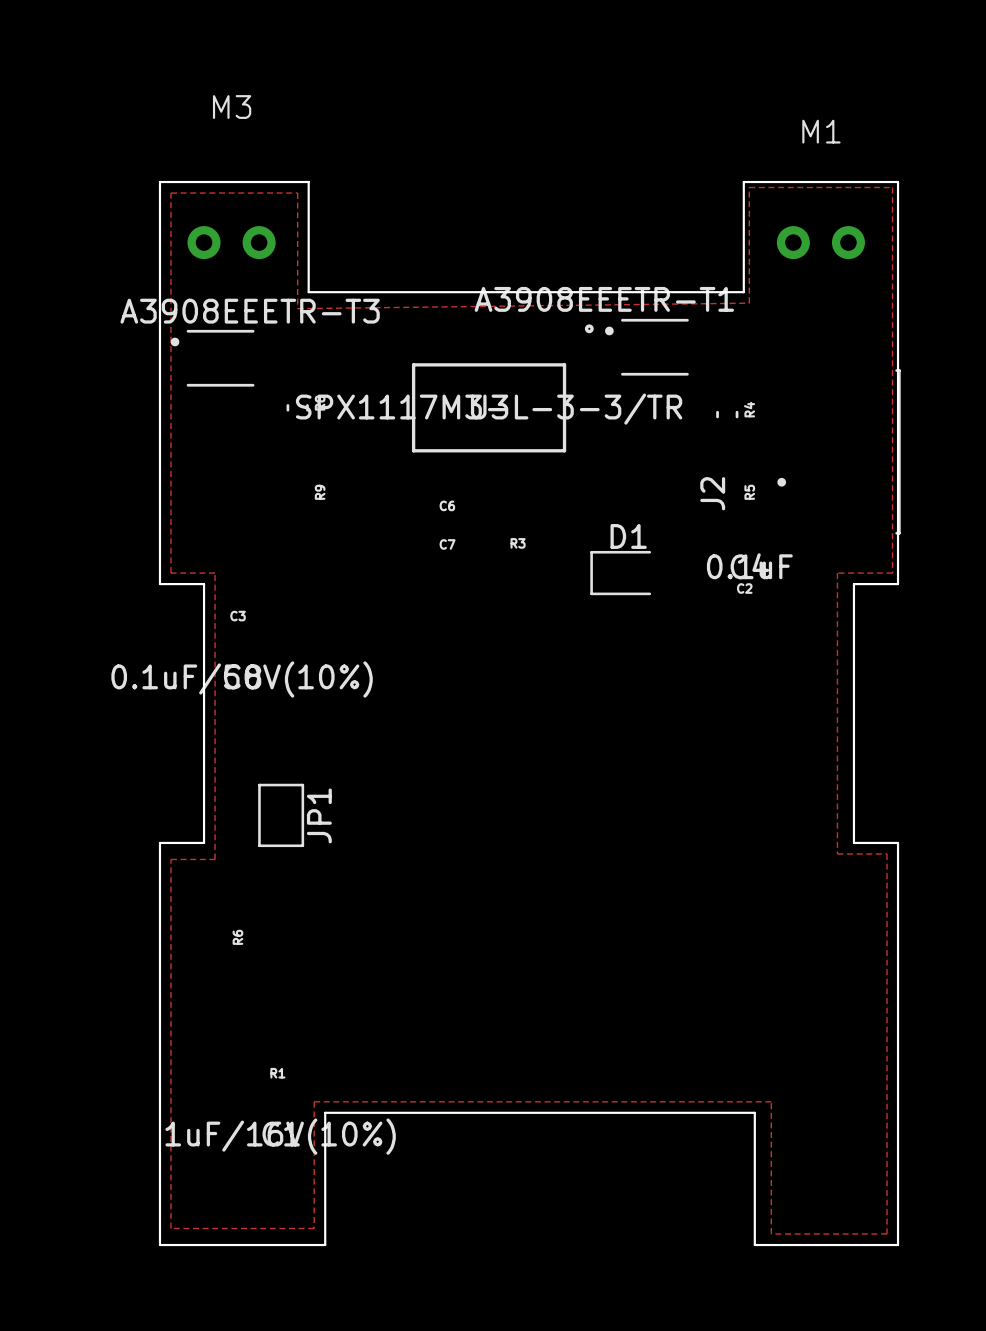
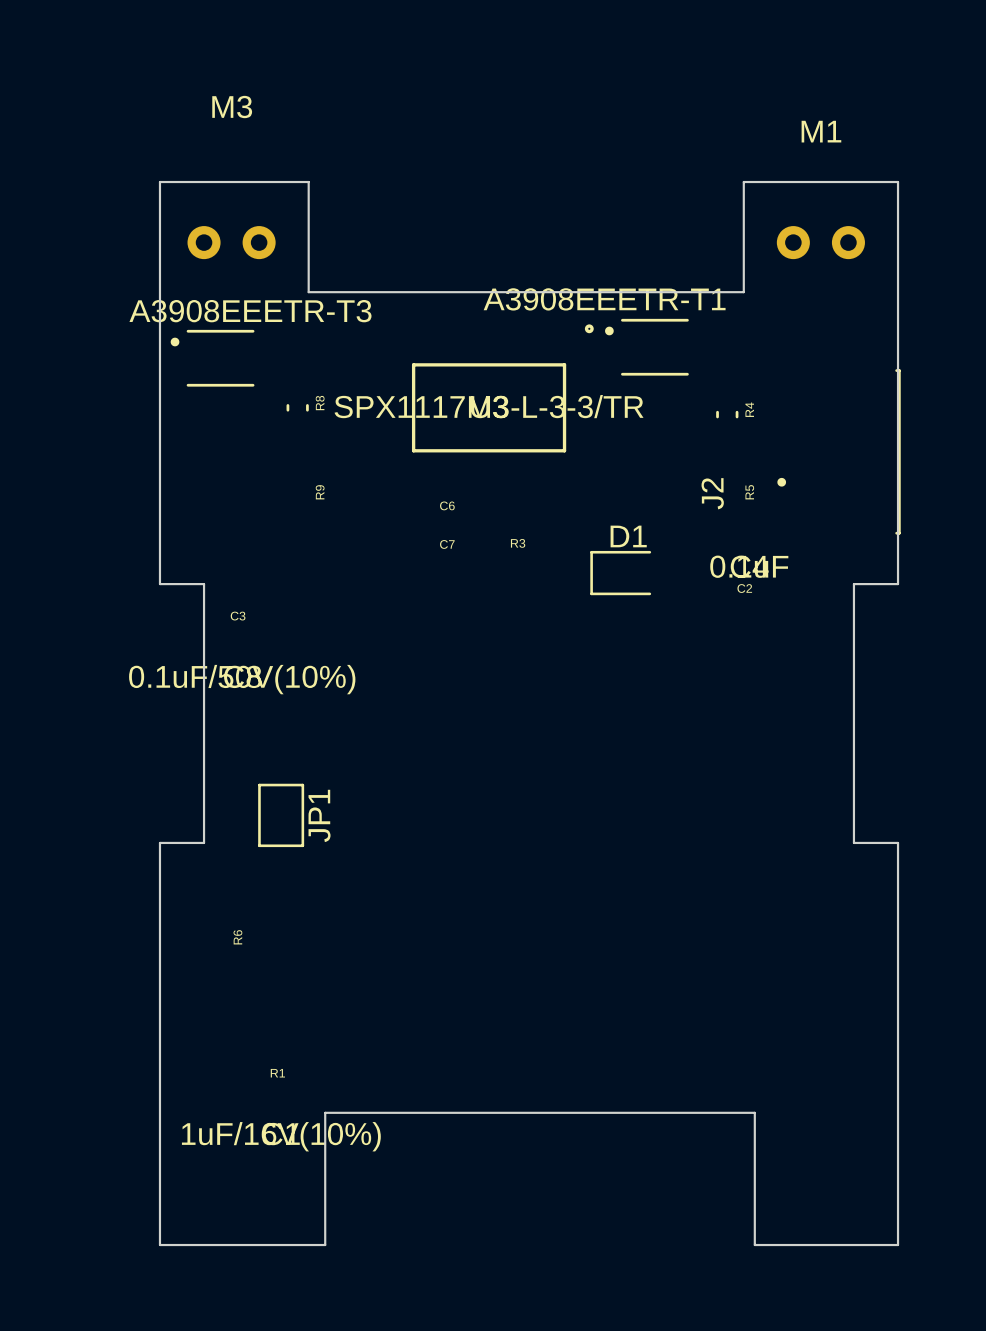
zone outline: (749, 187) (749, 303) (297, 308) (297, 193) (170, 193) (170, 573) (215, 573) (215, 859) (170, 859) (170, 1228) (314, 1228) (314, 1101) (771, 1101) (771, 1234) (887, 1234) (887, 853) (837, 853) (837, 573) (892, 573) (892, 187) (749, 187) -> none

